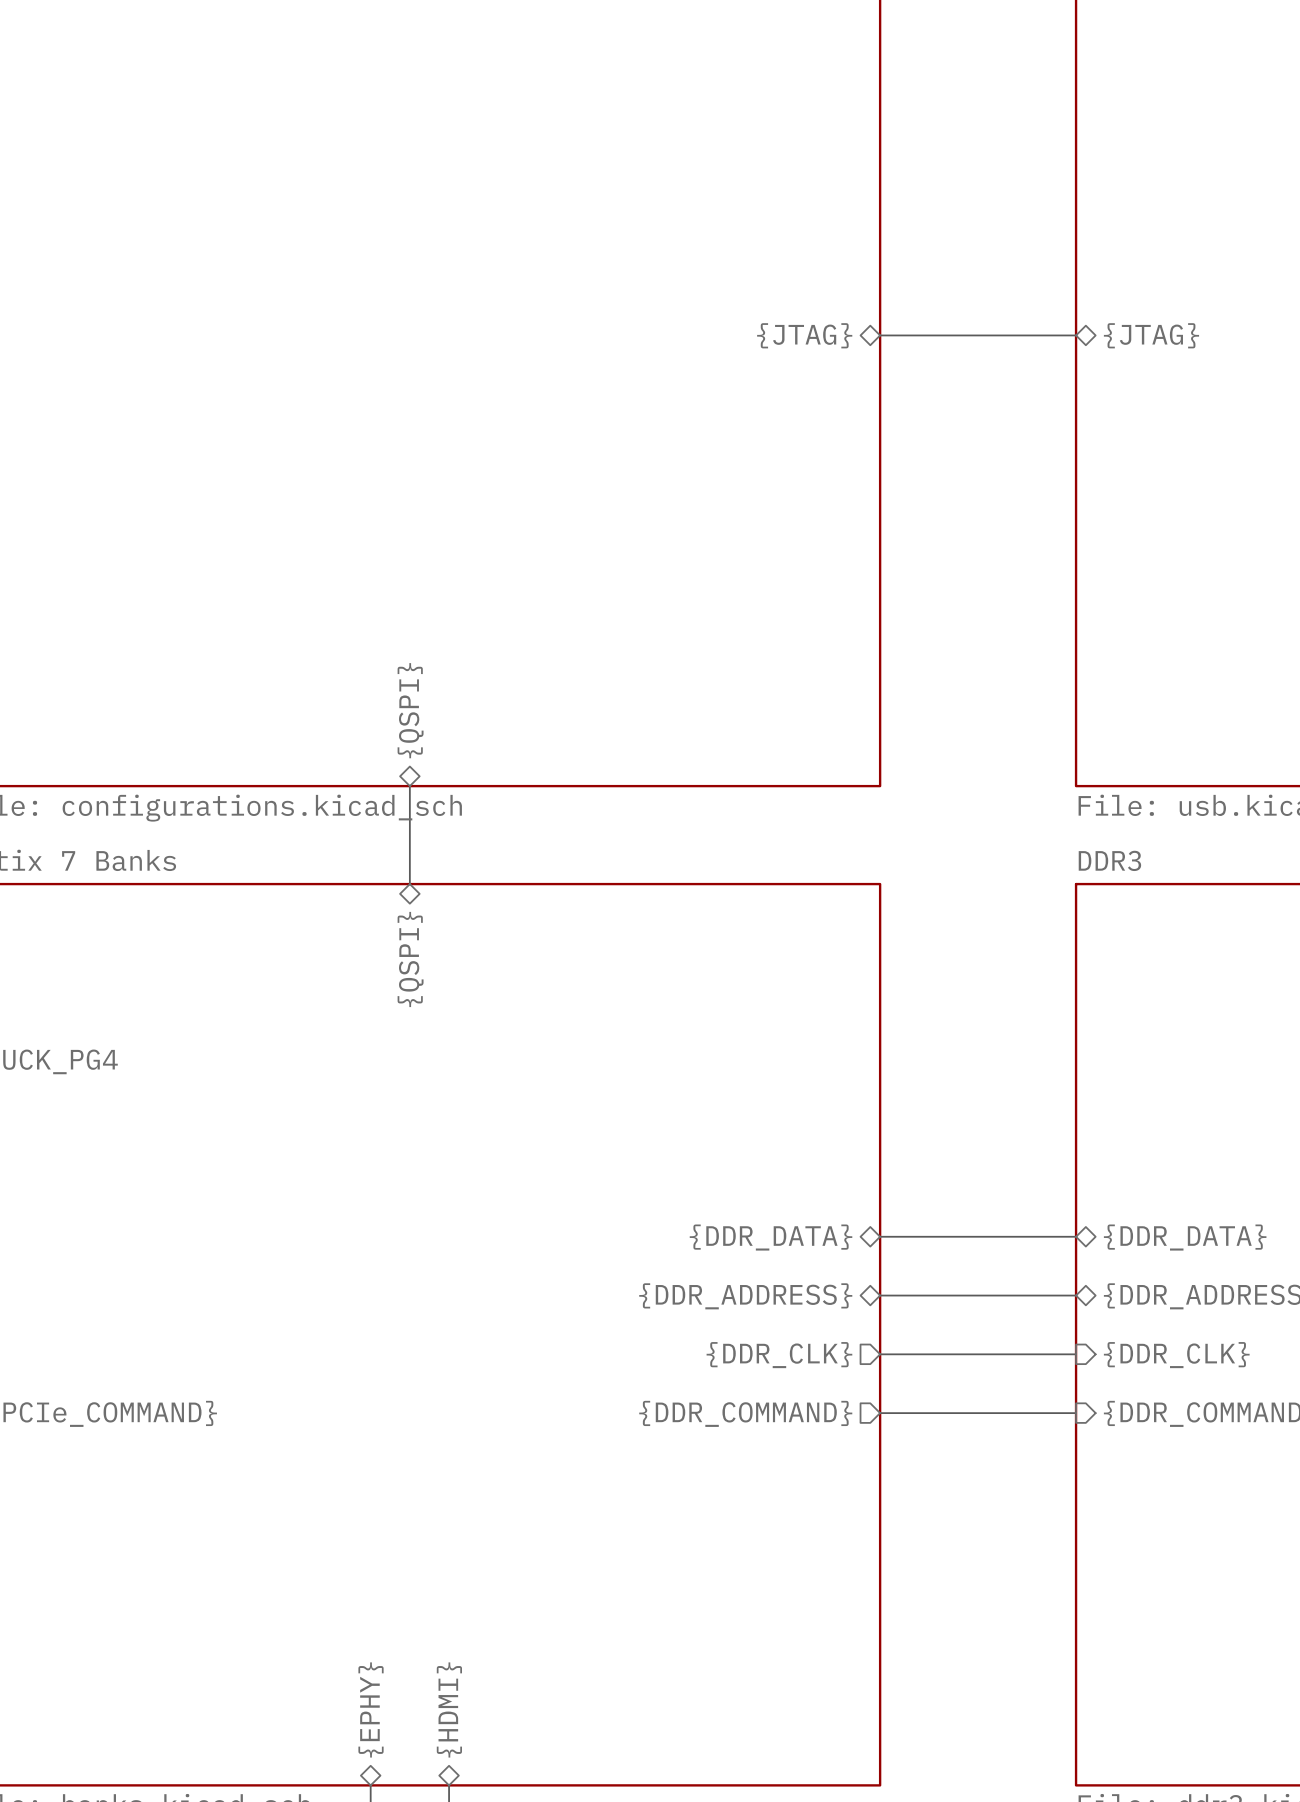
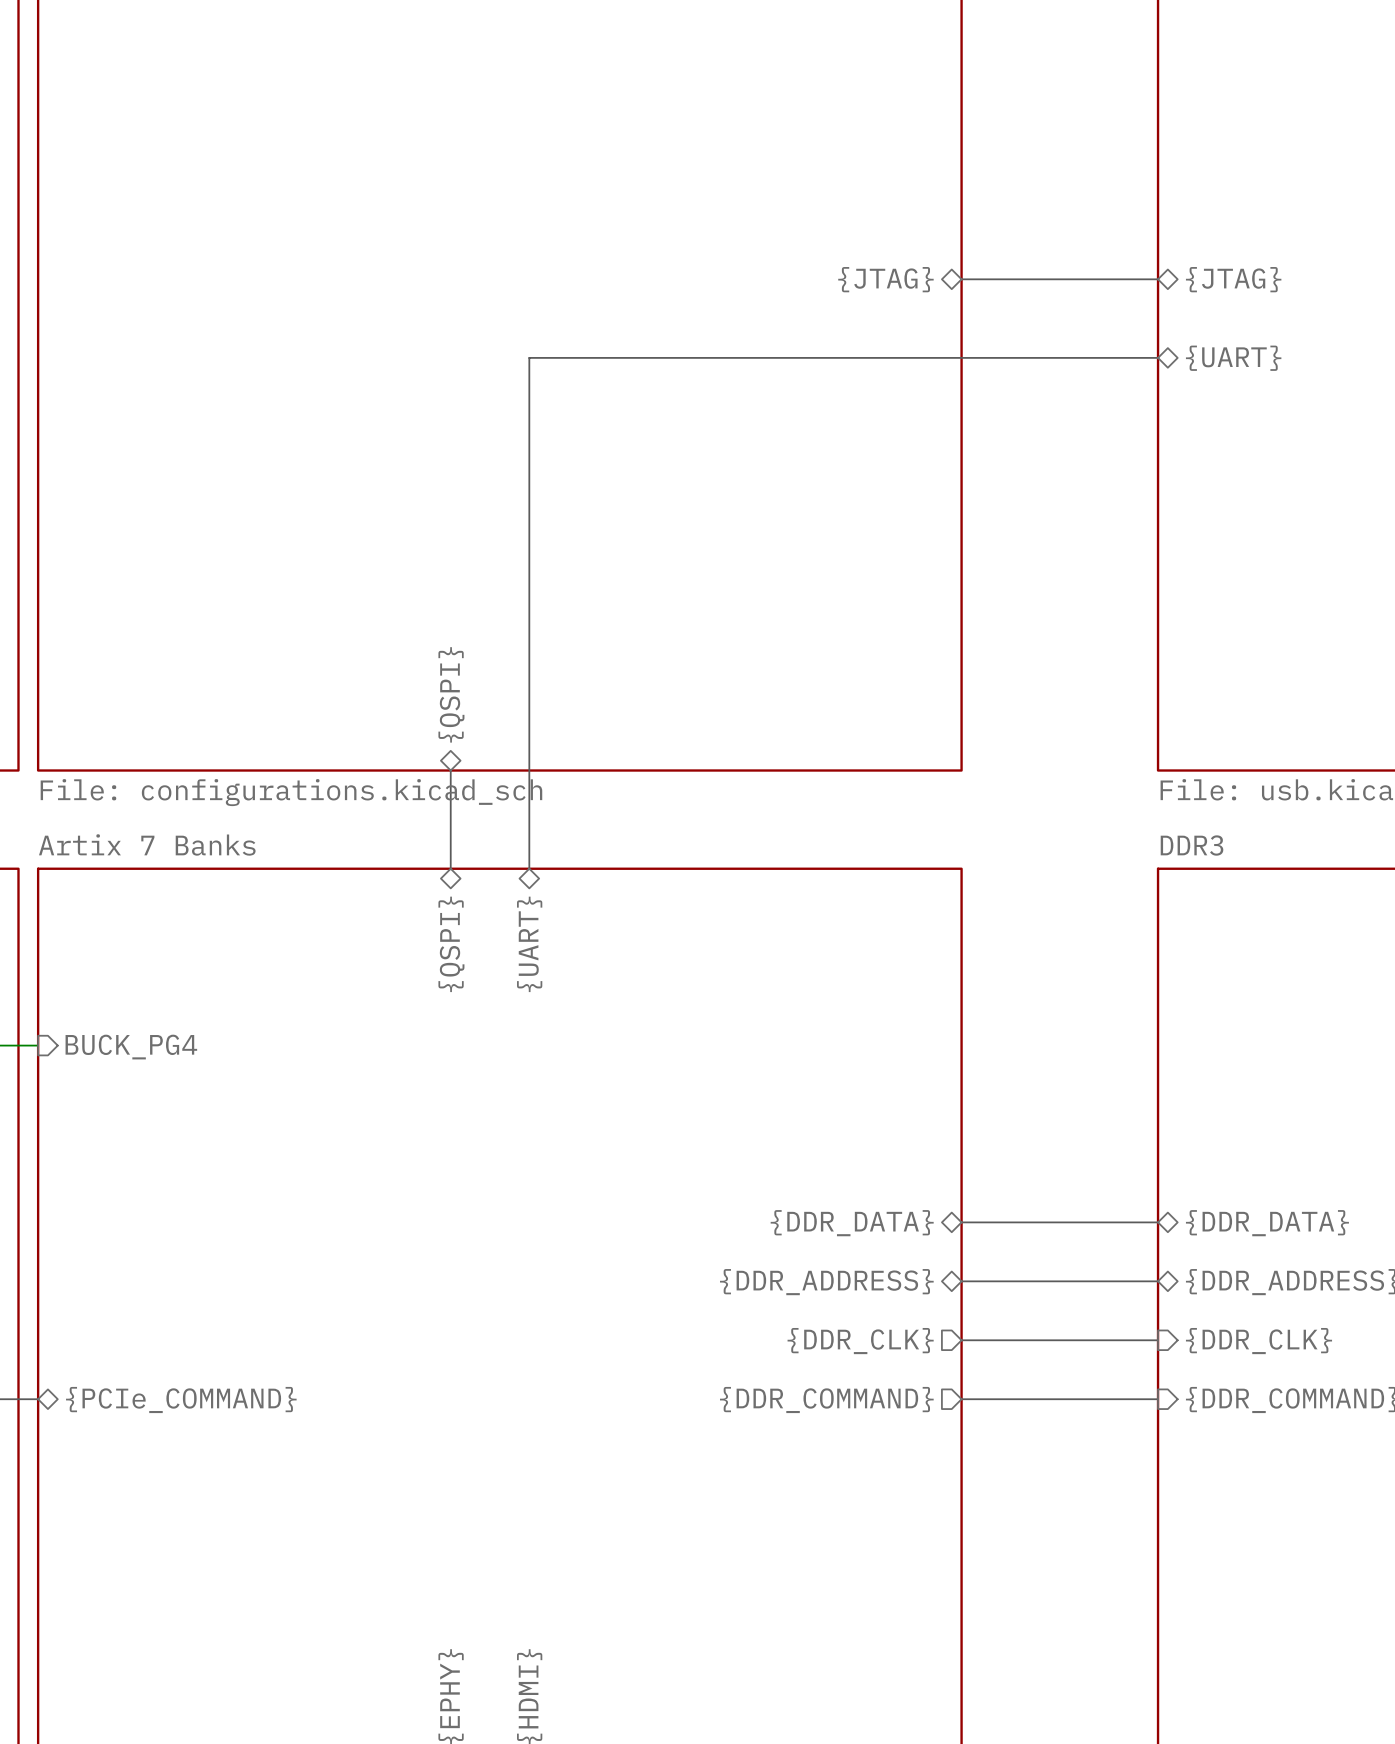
sheet pin position: {JTAG} (804, 335) -> {JTAG} (885, 279)
bus: (880, 335) (1076, 335) -> (961, 279) (1158, 279)
sheet pin position: {JTAG} (1151, 335) -> {JTAG} (1233, 279)
bus: none -> (1158, 357) (529, 357) (529, 868)
sheet pin: none -> {UART} (1233, 358)
sheet pin position: {QSPI} (410, 710) -> {QSPI} (451, 694)
bus: (409, 786) (409, 884) -> (450, 770) (450, 868)
sheet pin position: {QSPI} (410, 959) -> {QSPI} (451, 944)
sheet pin: none -> {UART} (529, 944)

